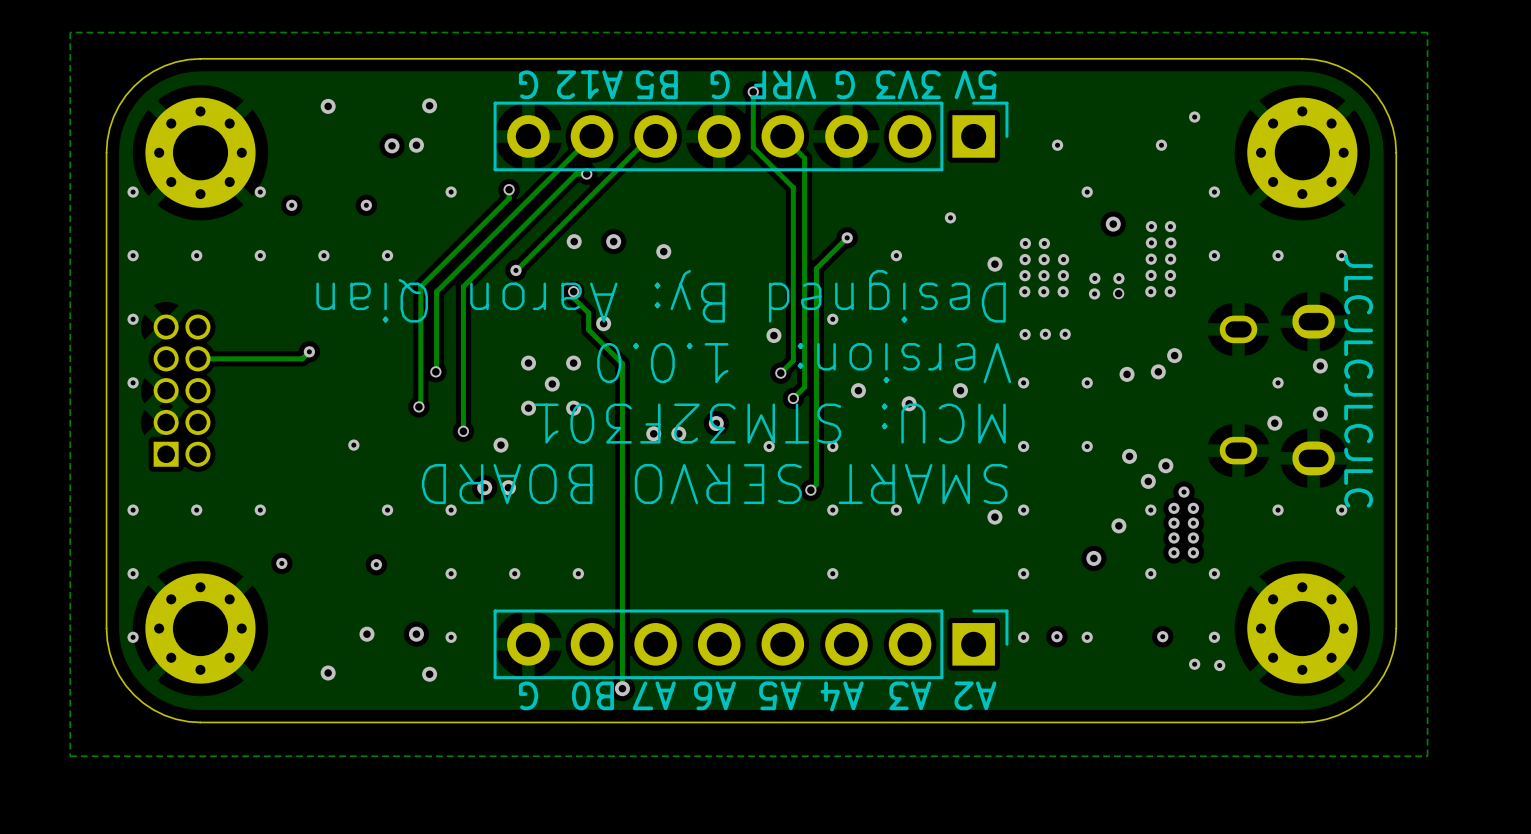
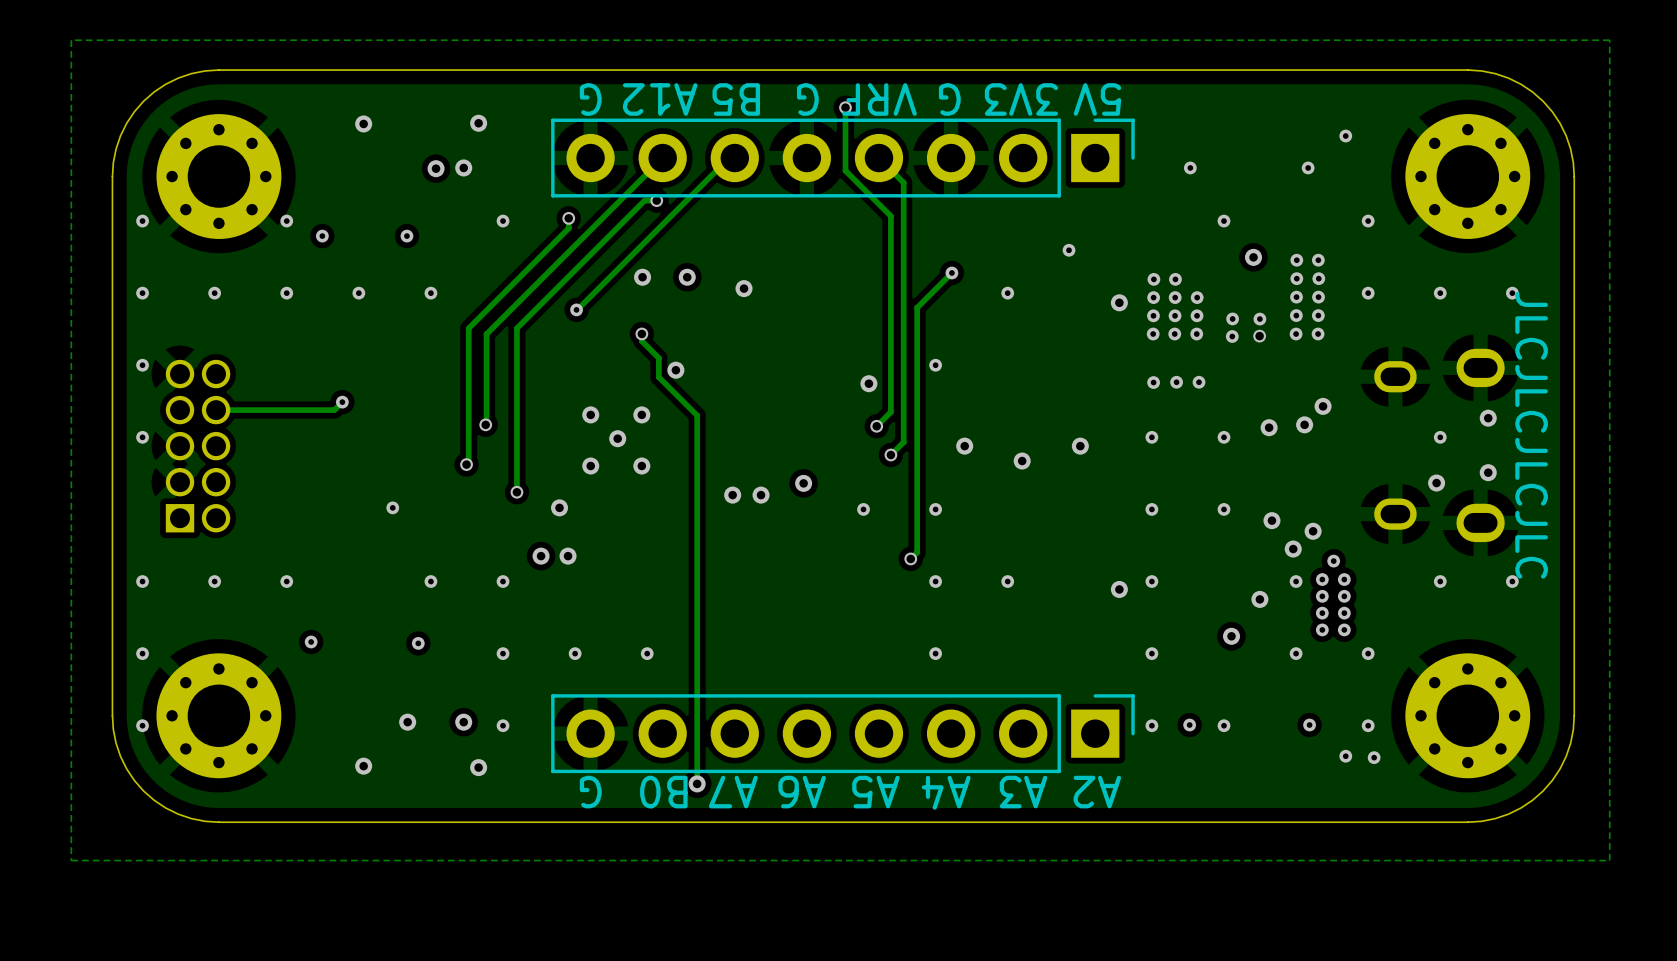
text: Designed By: Aaron Qian (661, 296) -> none
text: Version: 1.0.0 (804, 363) -> none
text: MCU: STM32F301 (770, 423) -> none
text: SMART SERVO BOARD (714, 484) -> none

